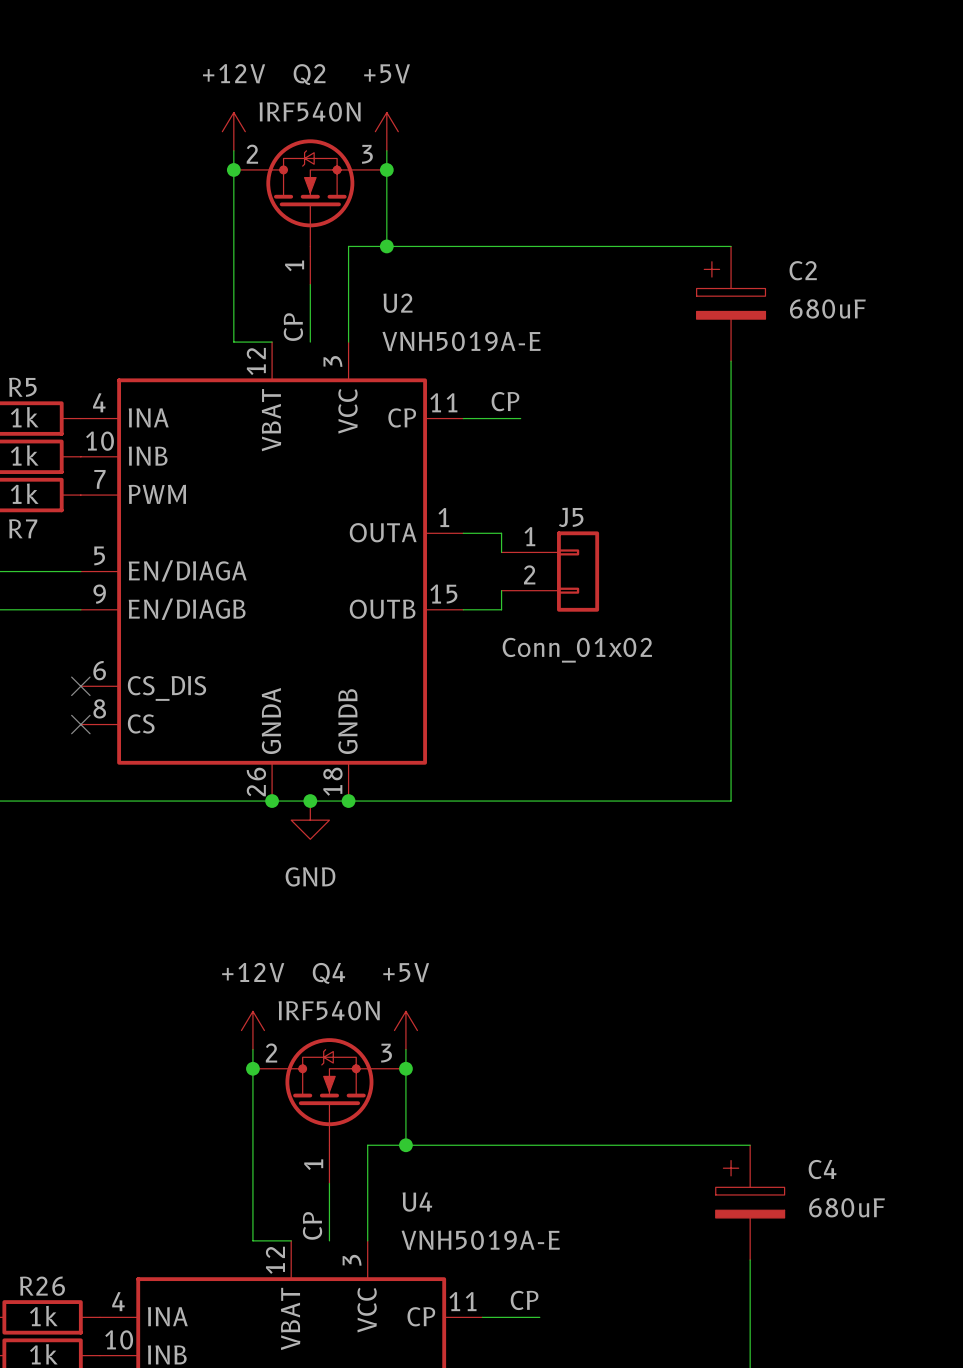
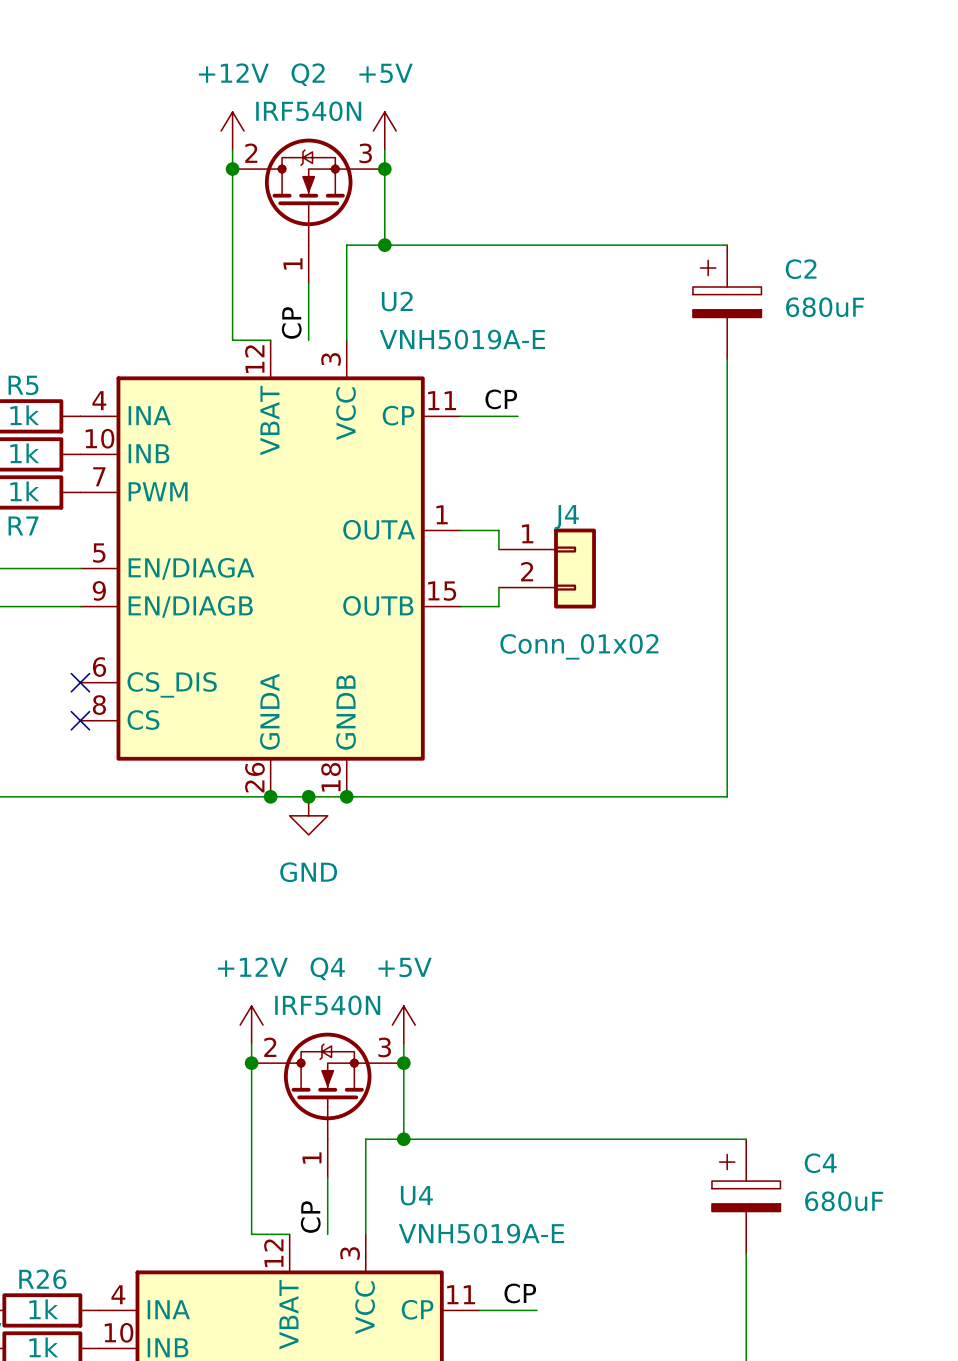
J5 name: J5 (571, 517) -> J4 (566, 517)

